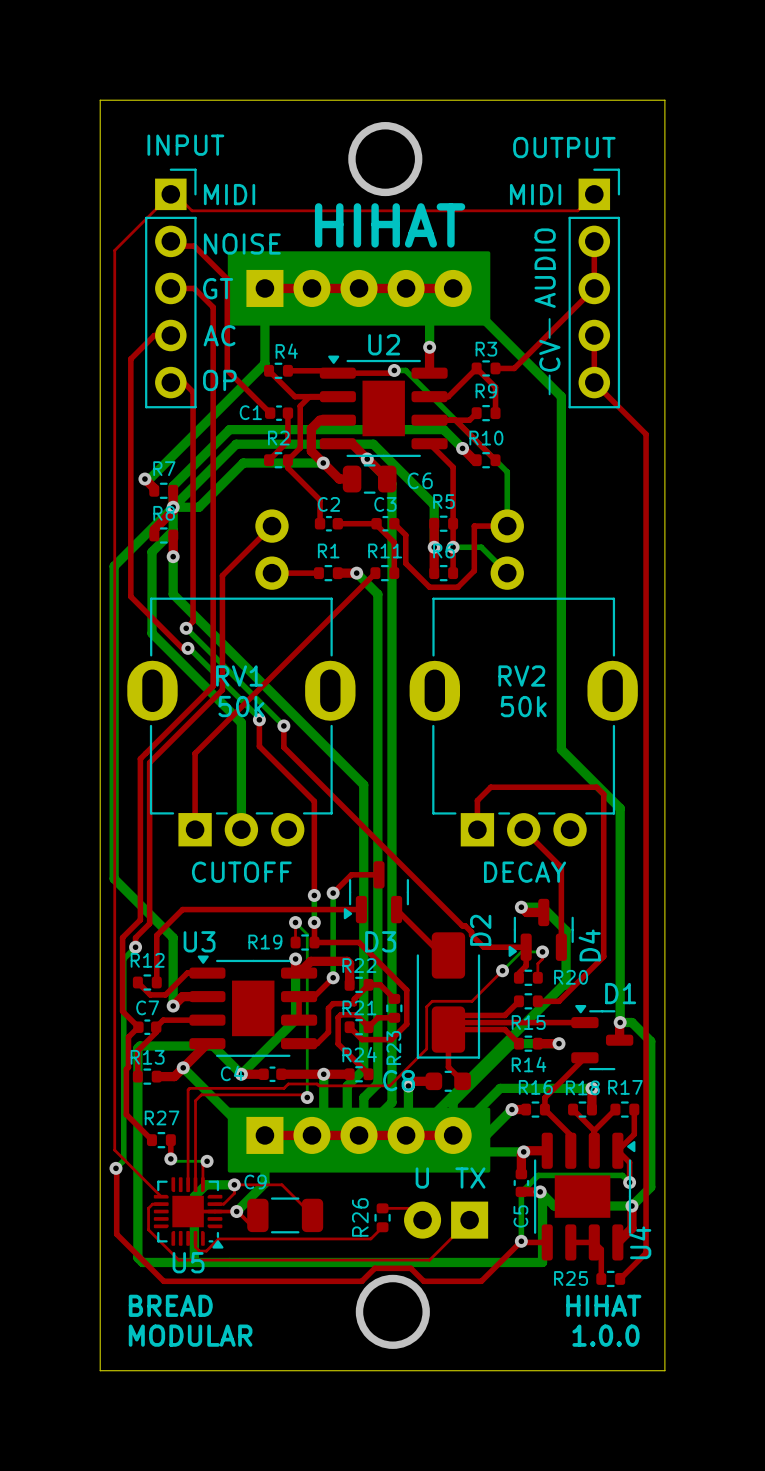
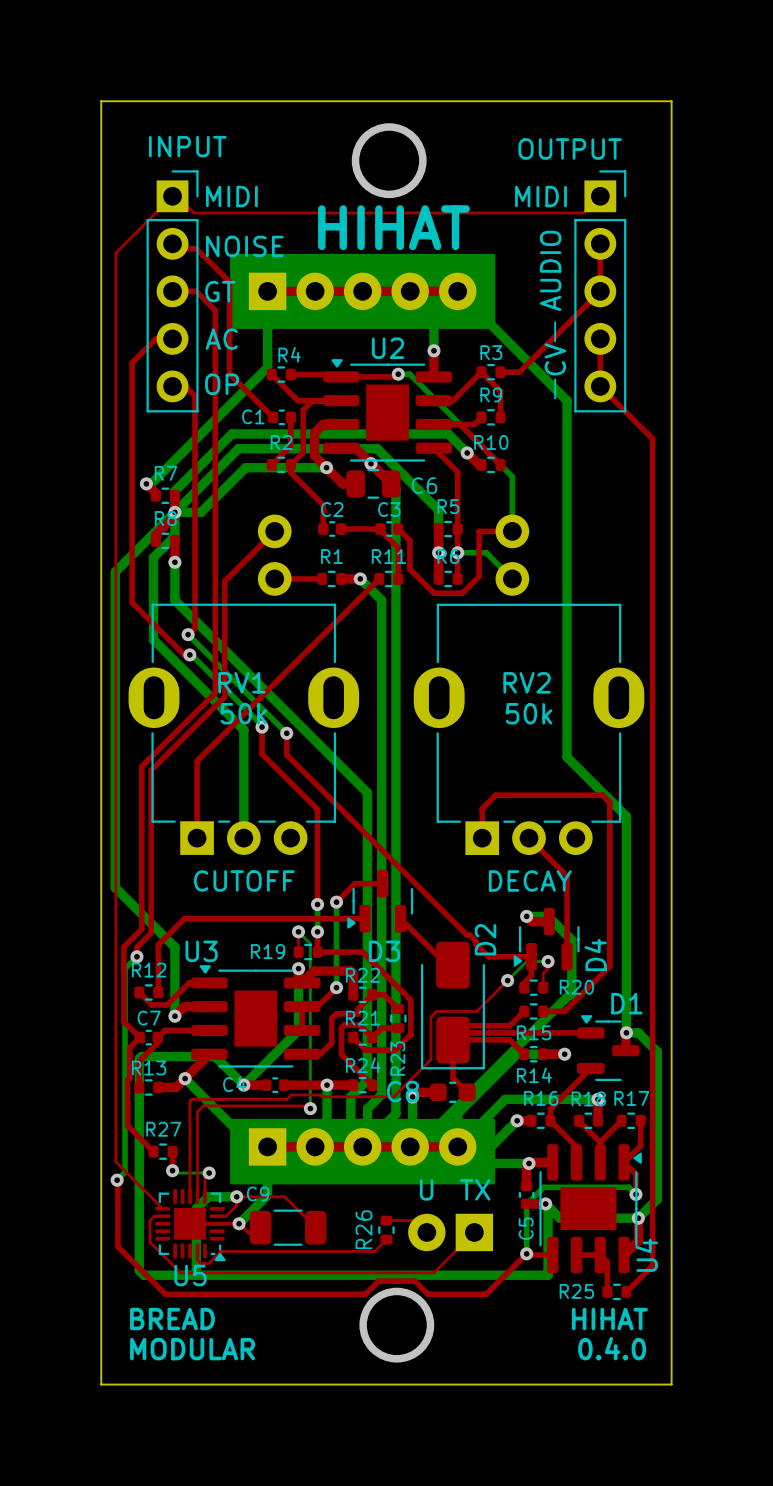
text: 1.0.0 (605, 1335) -> 0.4.0 (612, 1348)

